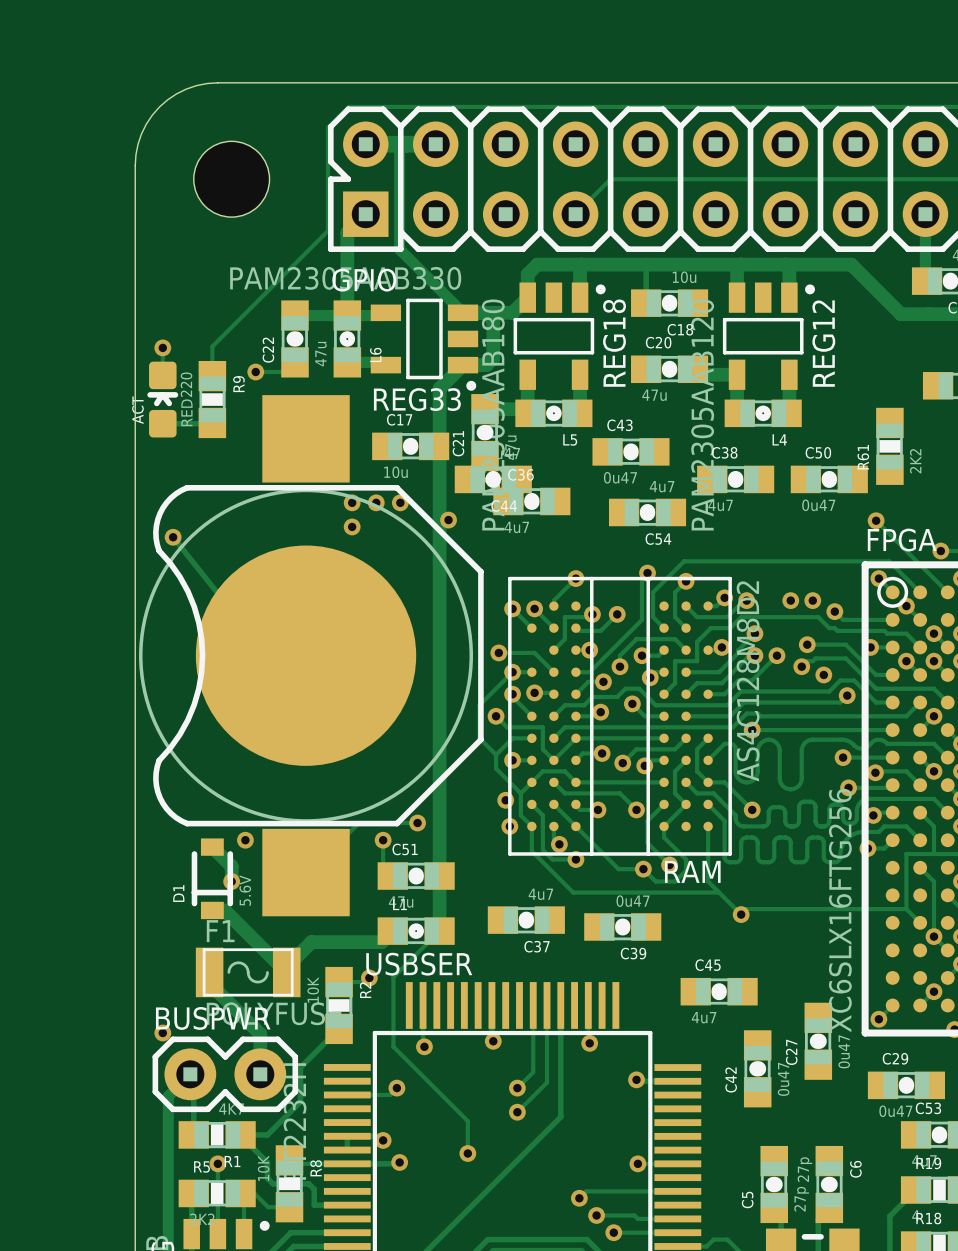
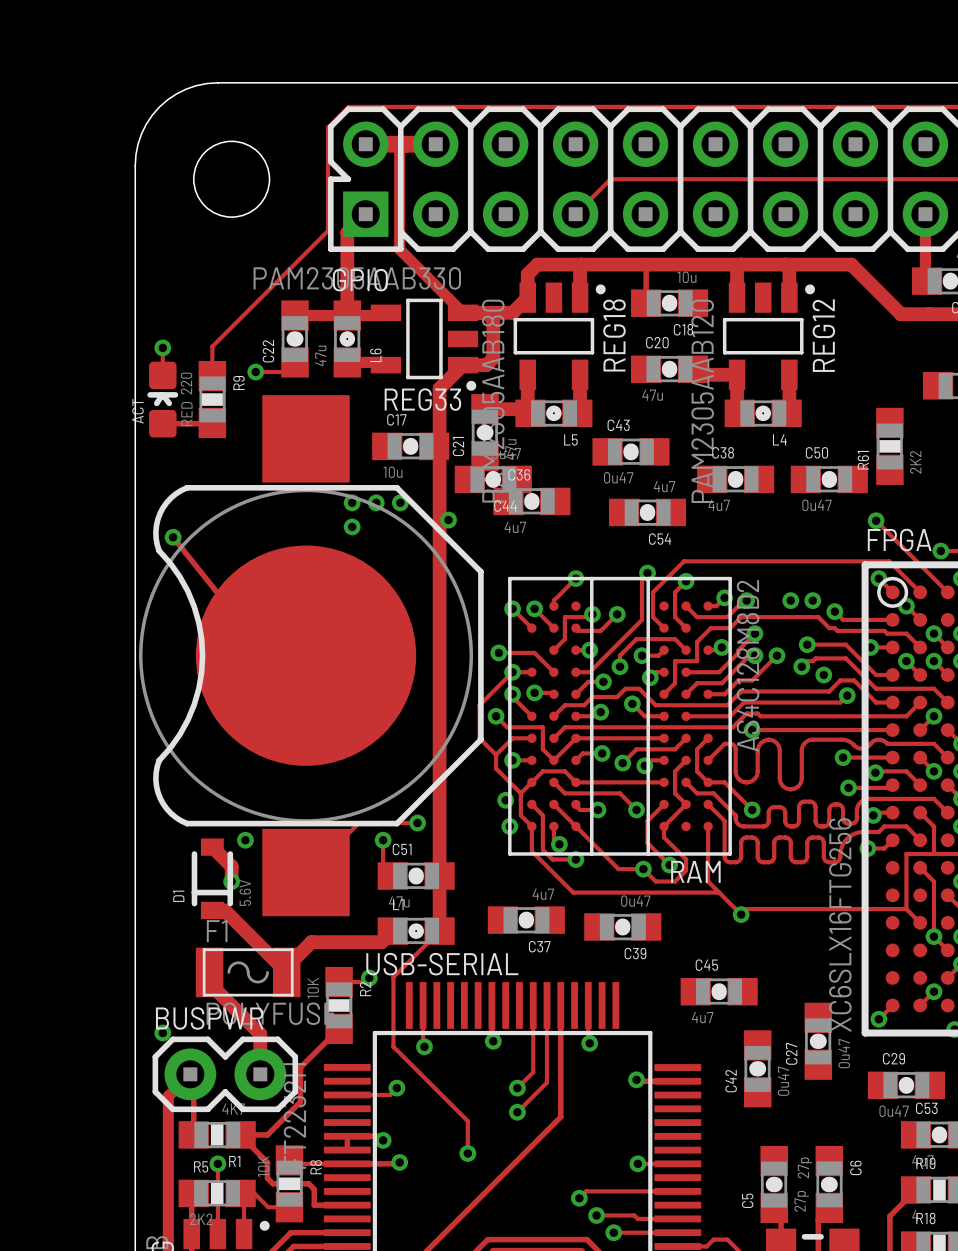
USBSER name: USBSER (419, 964) -> USB-SERIAL (442, 964)

